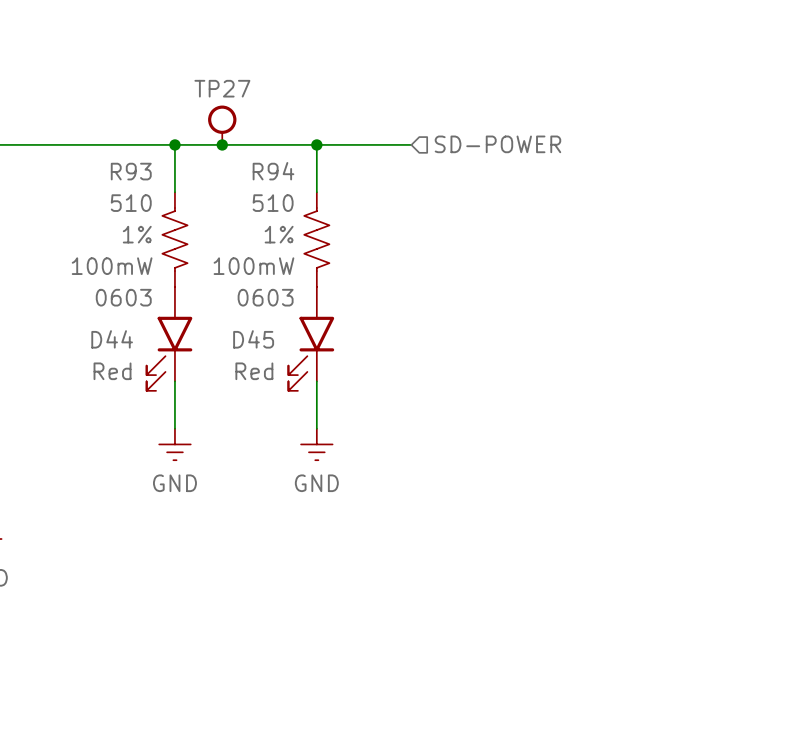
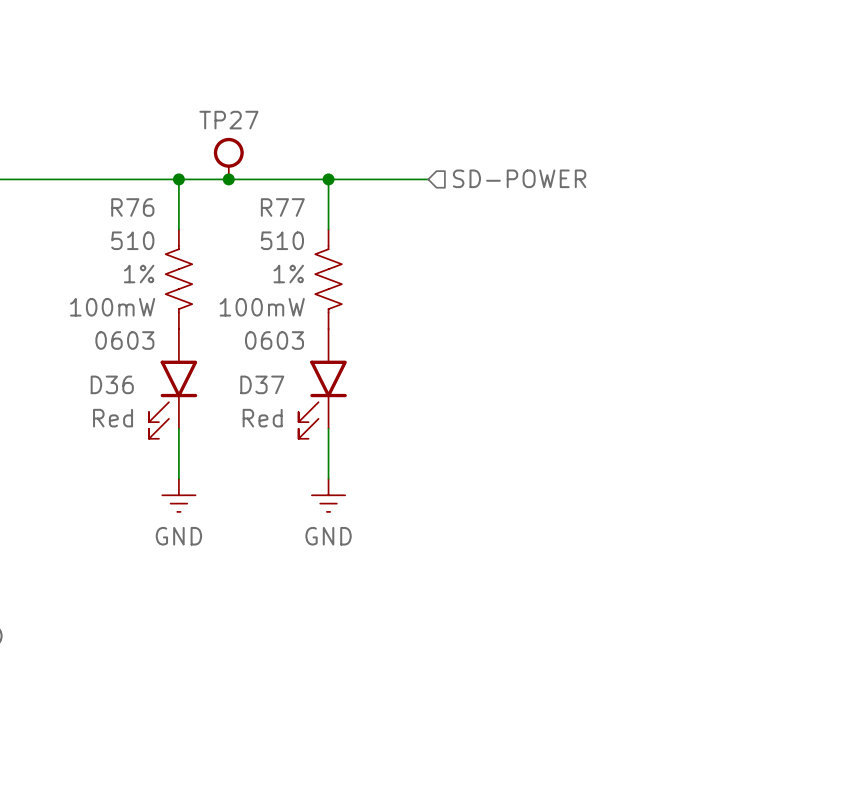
R93 name: R93 (131, 171) -> R76 (132, 207)
R94 name: R94 (273, 171) -> R77 (282, 207)
D44 name: D44 (112, 339) -> D36 (112, 384)
D45 name: D45 (253, 339) -> D37 (262, 384)

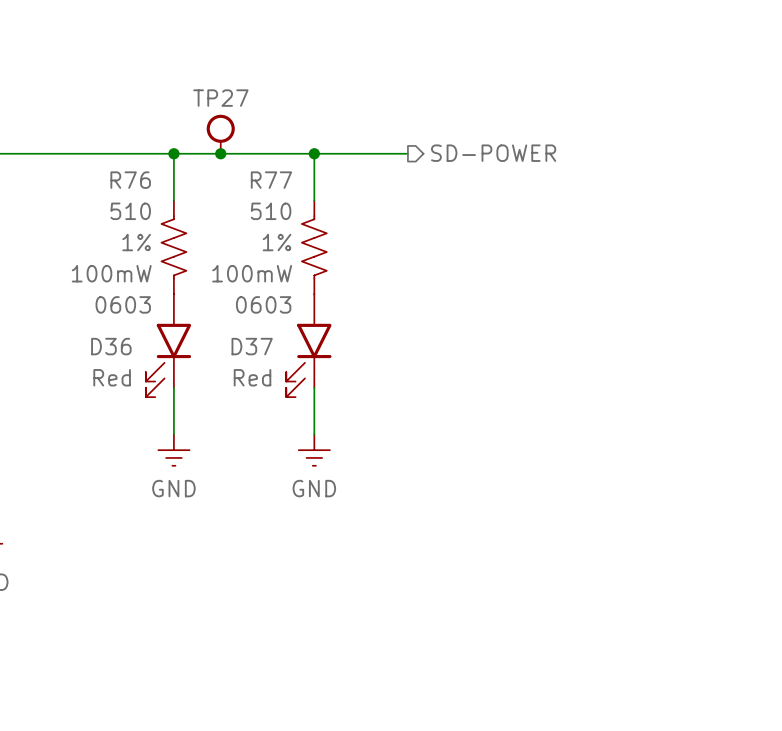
hierarchical label shape: input (519, 178) -> output (493, 153)

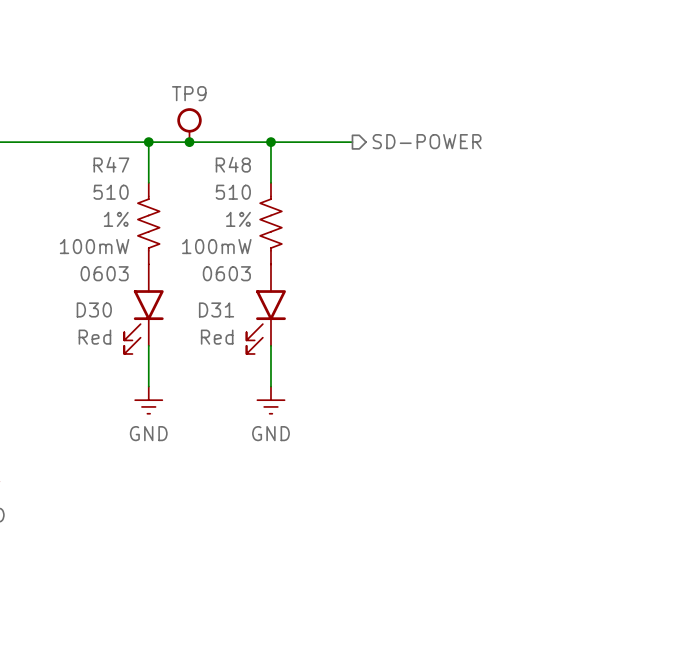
TP27 name: TP27 (220, 98) -> TP9 (189, 93)
R76 name: R76 (130, 180) -> R47 (111, 164)
R77 name: R77 (271, 180) -> R48 (233, 164)
D36 name: D36 (111, 346) -> D30 (94, 309)
D37 name: D37 (252, 346) -> D31 (216, 309)

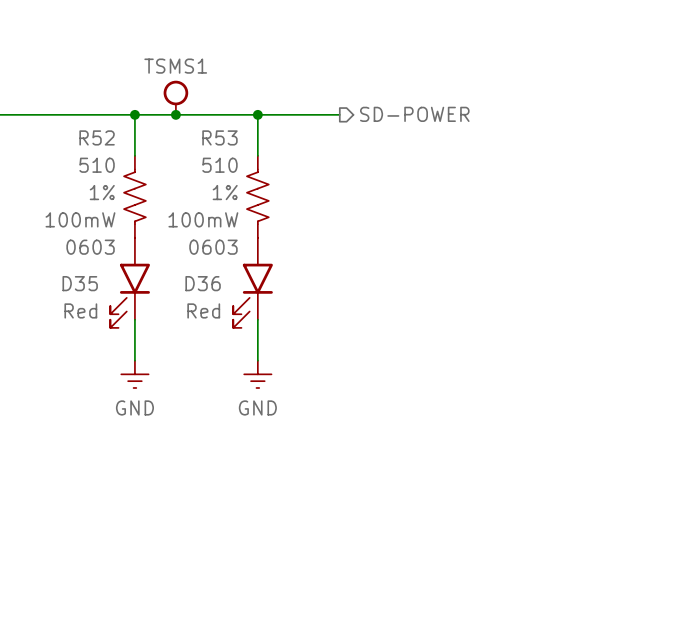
TP9 name: TP9 (189, 93) -> TSMS1 (175, 66)
R47 name: R47 (111, 164) -> R52 (97, 137)
R48 name: R48 (233, 164) -> R53 (219, 137)
D30 name: D30 (94, 309) -> D35 (80, 283)
D31 name: D31 (216, 309) -> D36 (203, 283)

